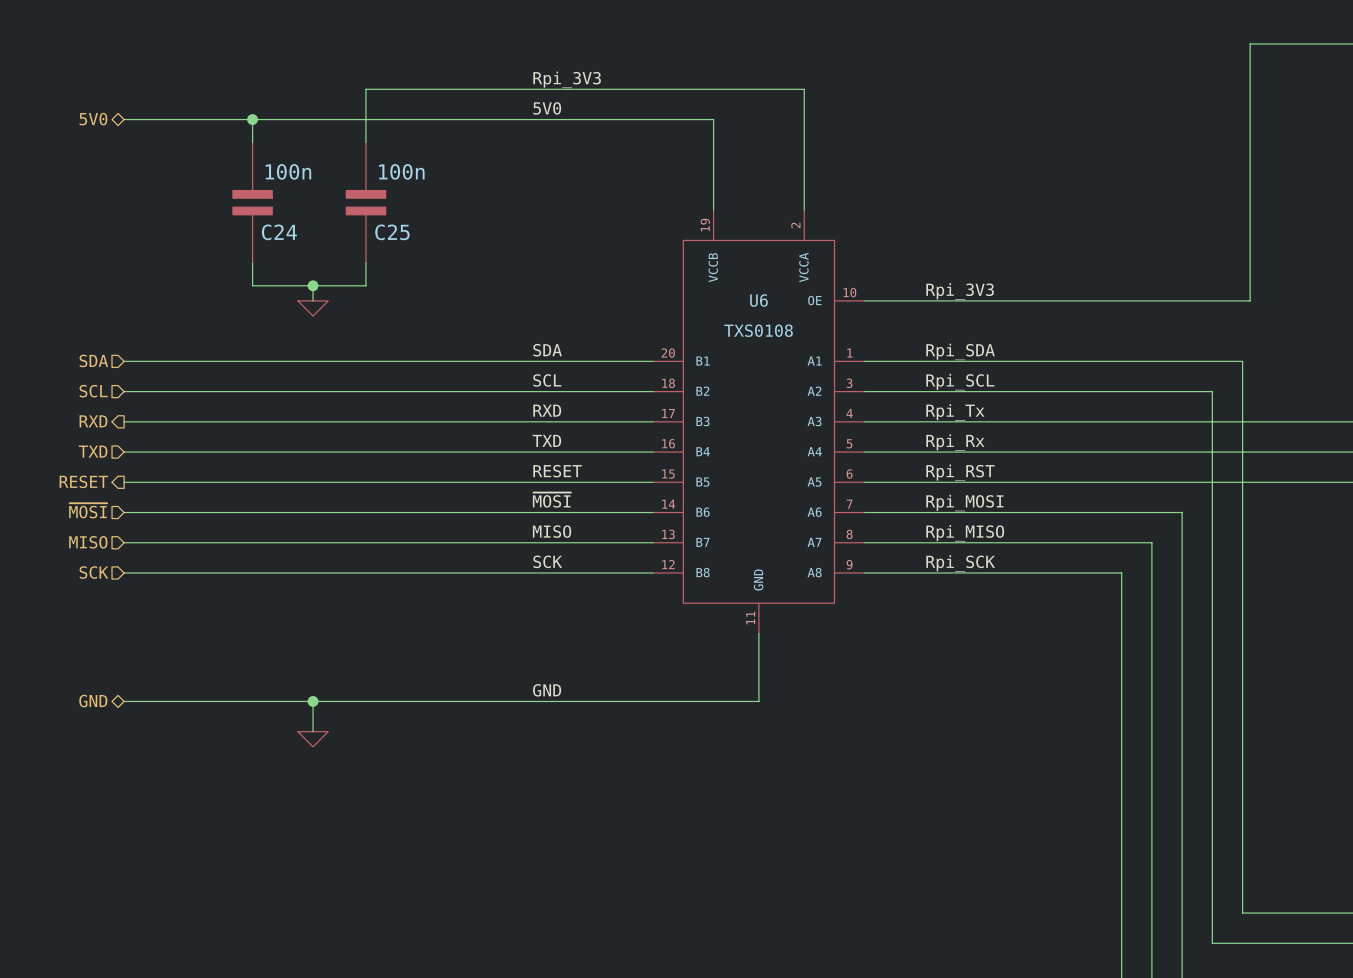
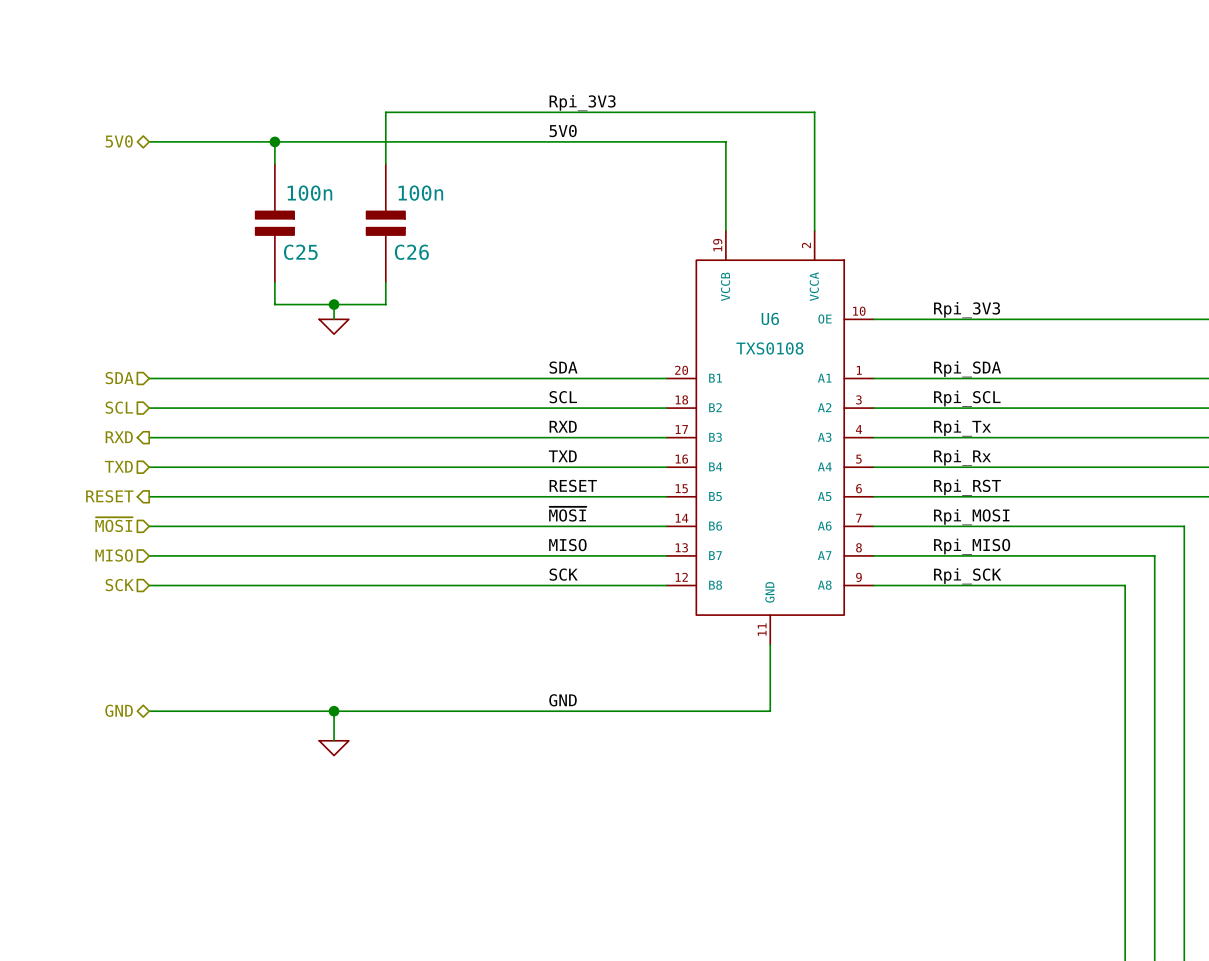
C24 name: C24 (279, 232) -> C25 (300, 252)
C25 name: C25 (392, 232) -> C26 (411, 252)

